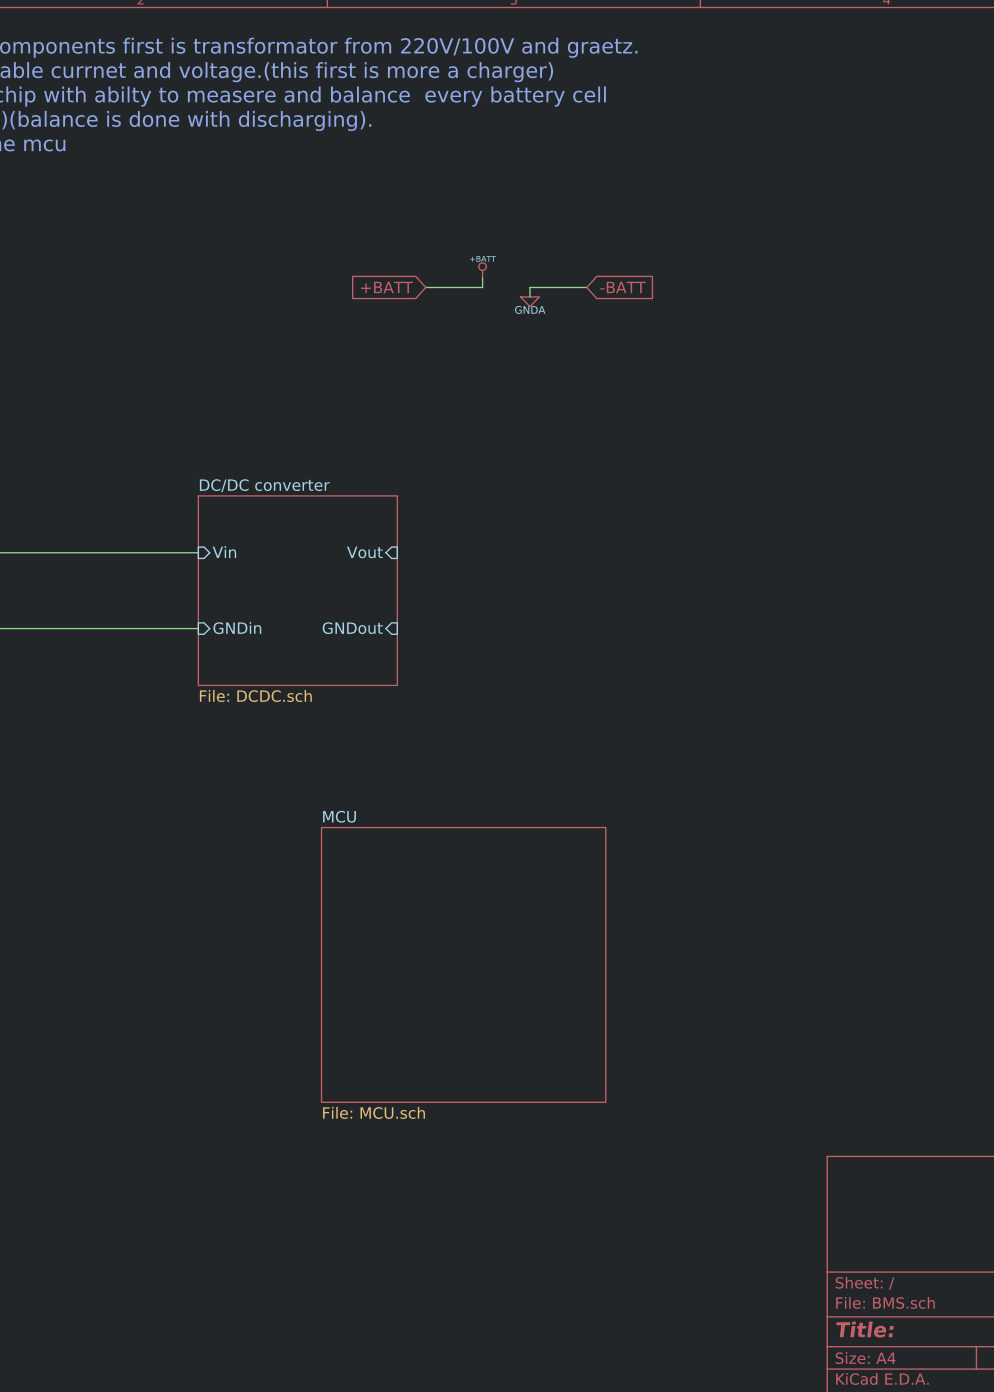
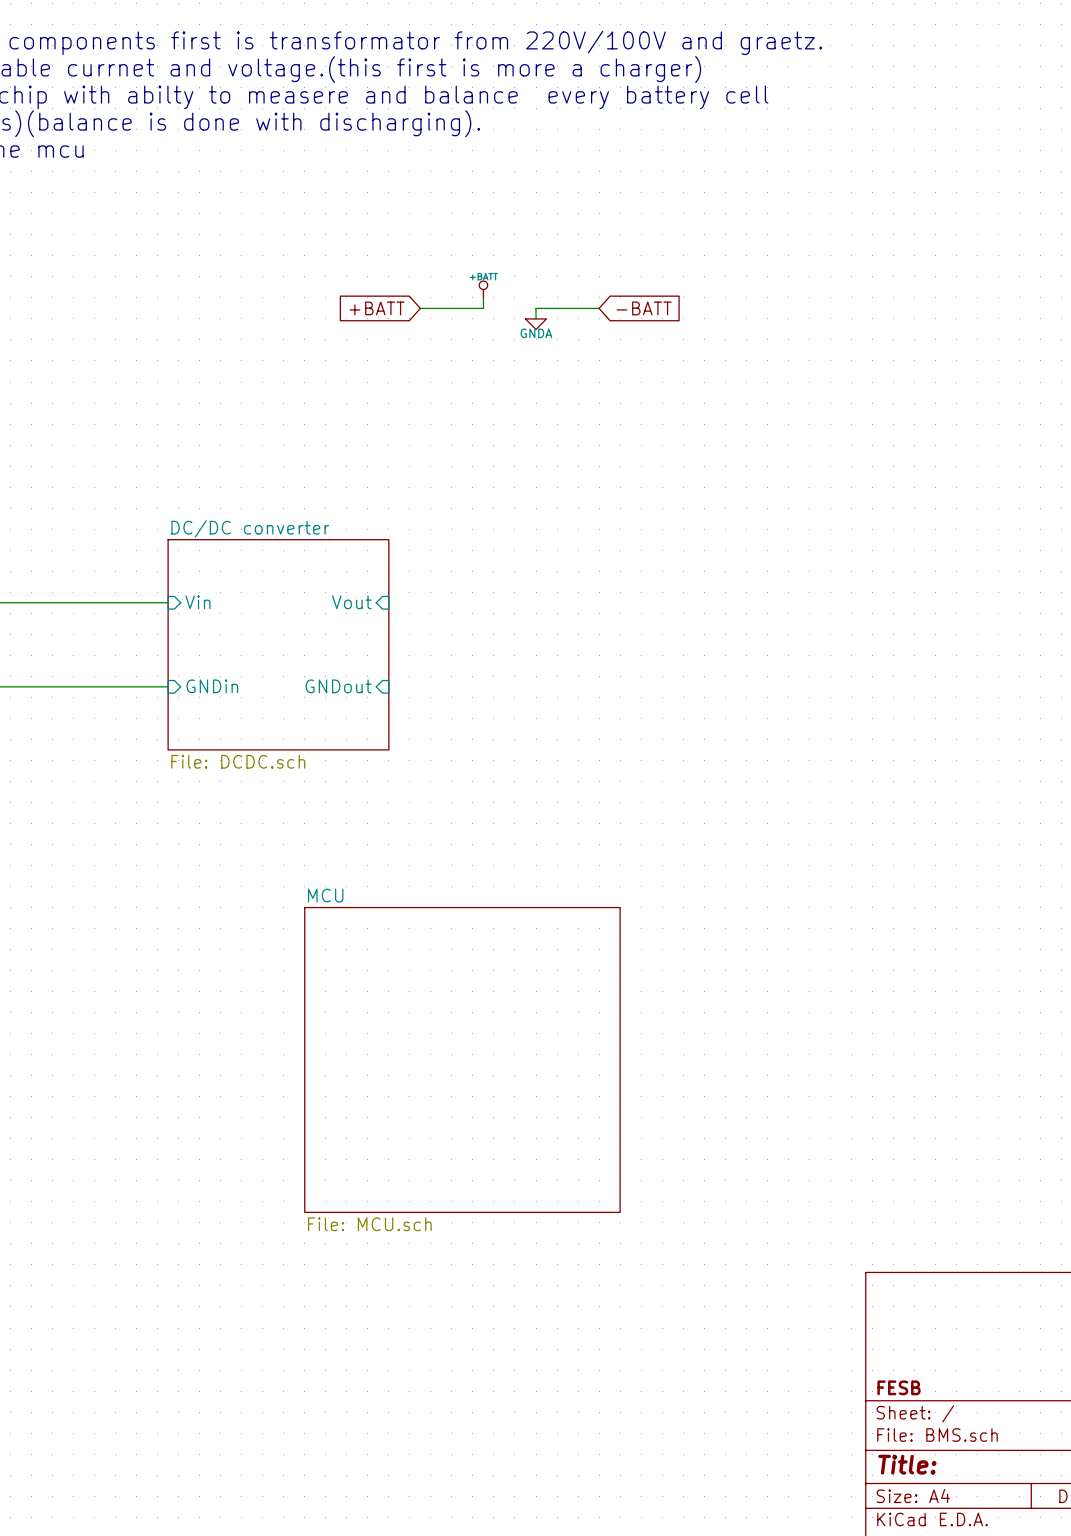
title block: none -> FESB (899, 1387)

